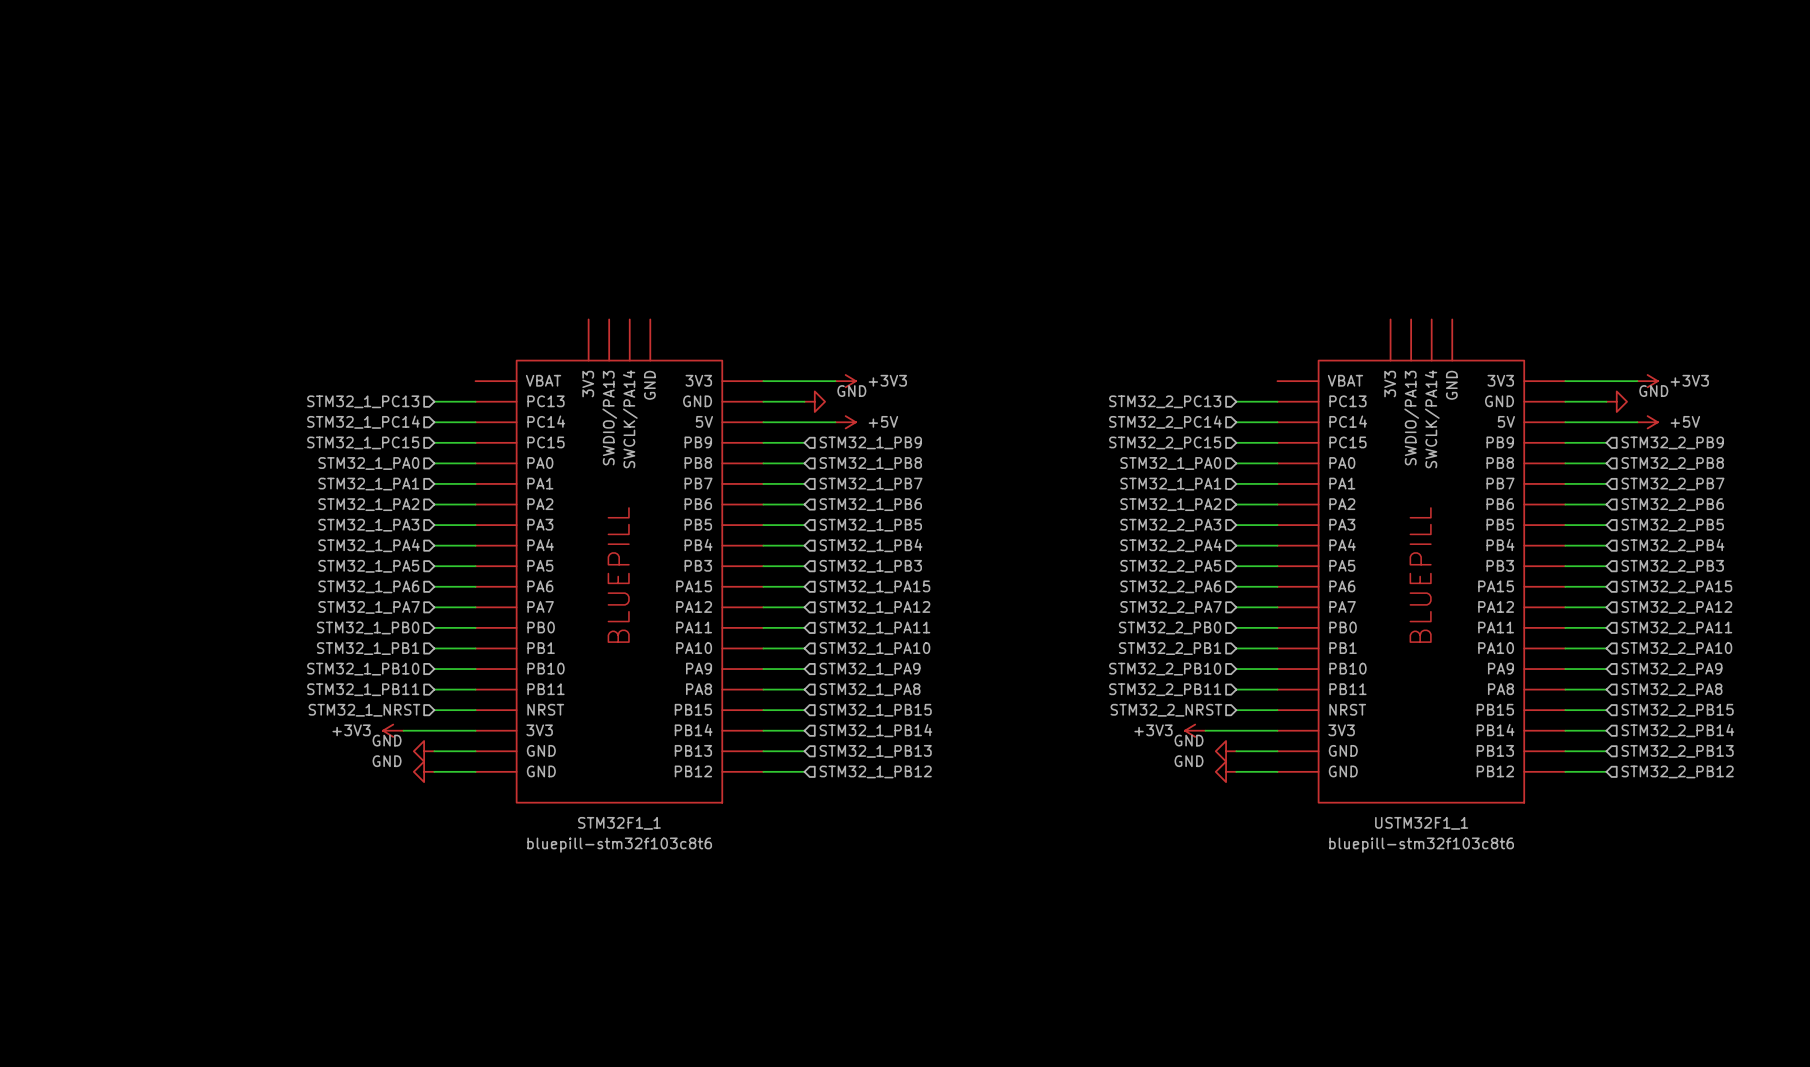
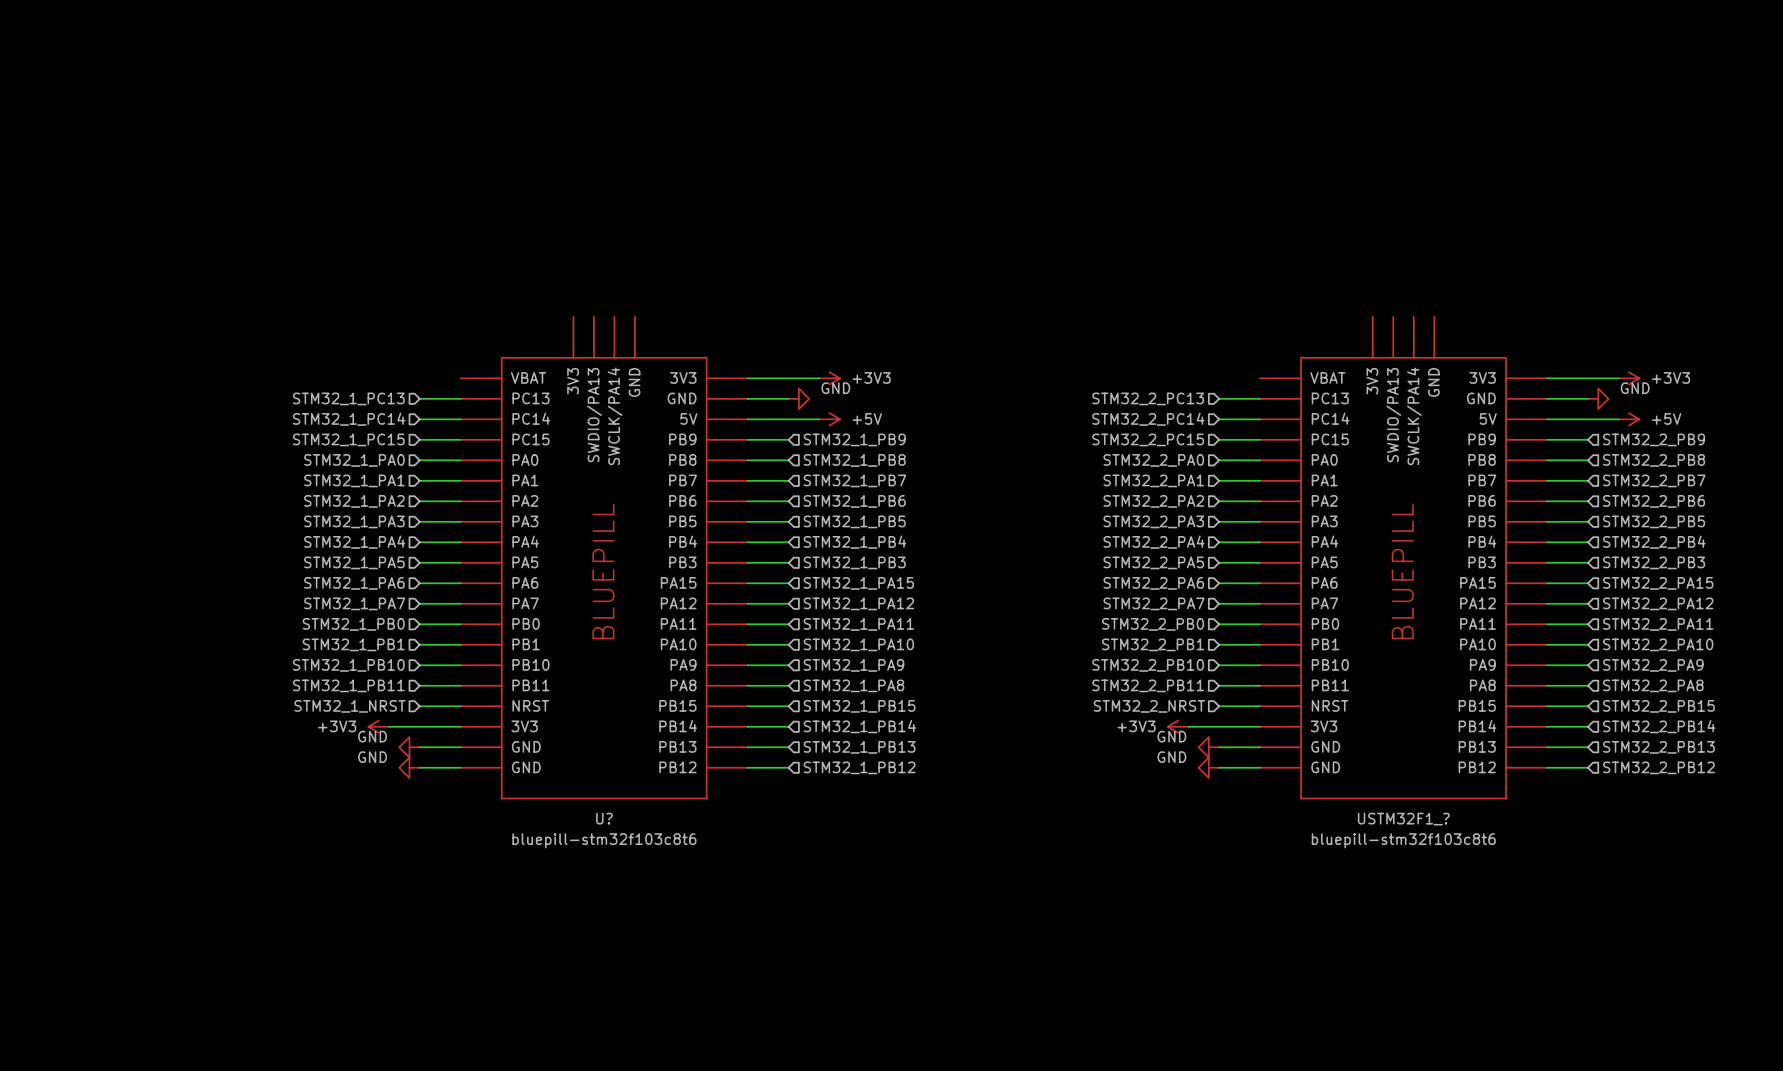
hierarchical label: STM32_1_PA0 (1170, 463) -> STM32_2_PA0 (1153, 460)
hierarchical label: STM32_1_PA1 (1170, 484) -> STM32_2_PA1 (1153, 480)
hierarchical label: STM32_1_PA2 (1170, 504) -> STM32_2_PA2 (1153, 501)
STM32F1_1 name: STM32F1_1 (619, 823) -> U? (604, 818)
USTM32F1_1 name: USTM32F1_1 (1421, 823) -> USTM32F1_? (1403, 819)

